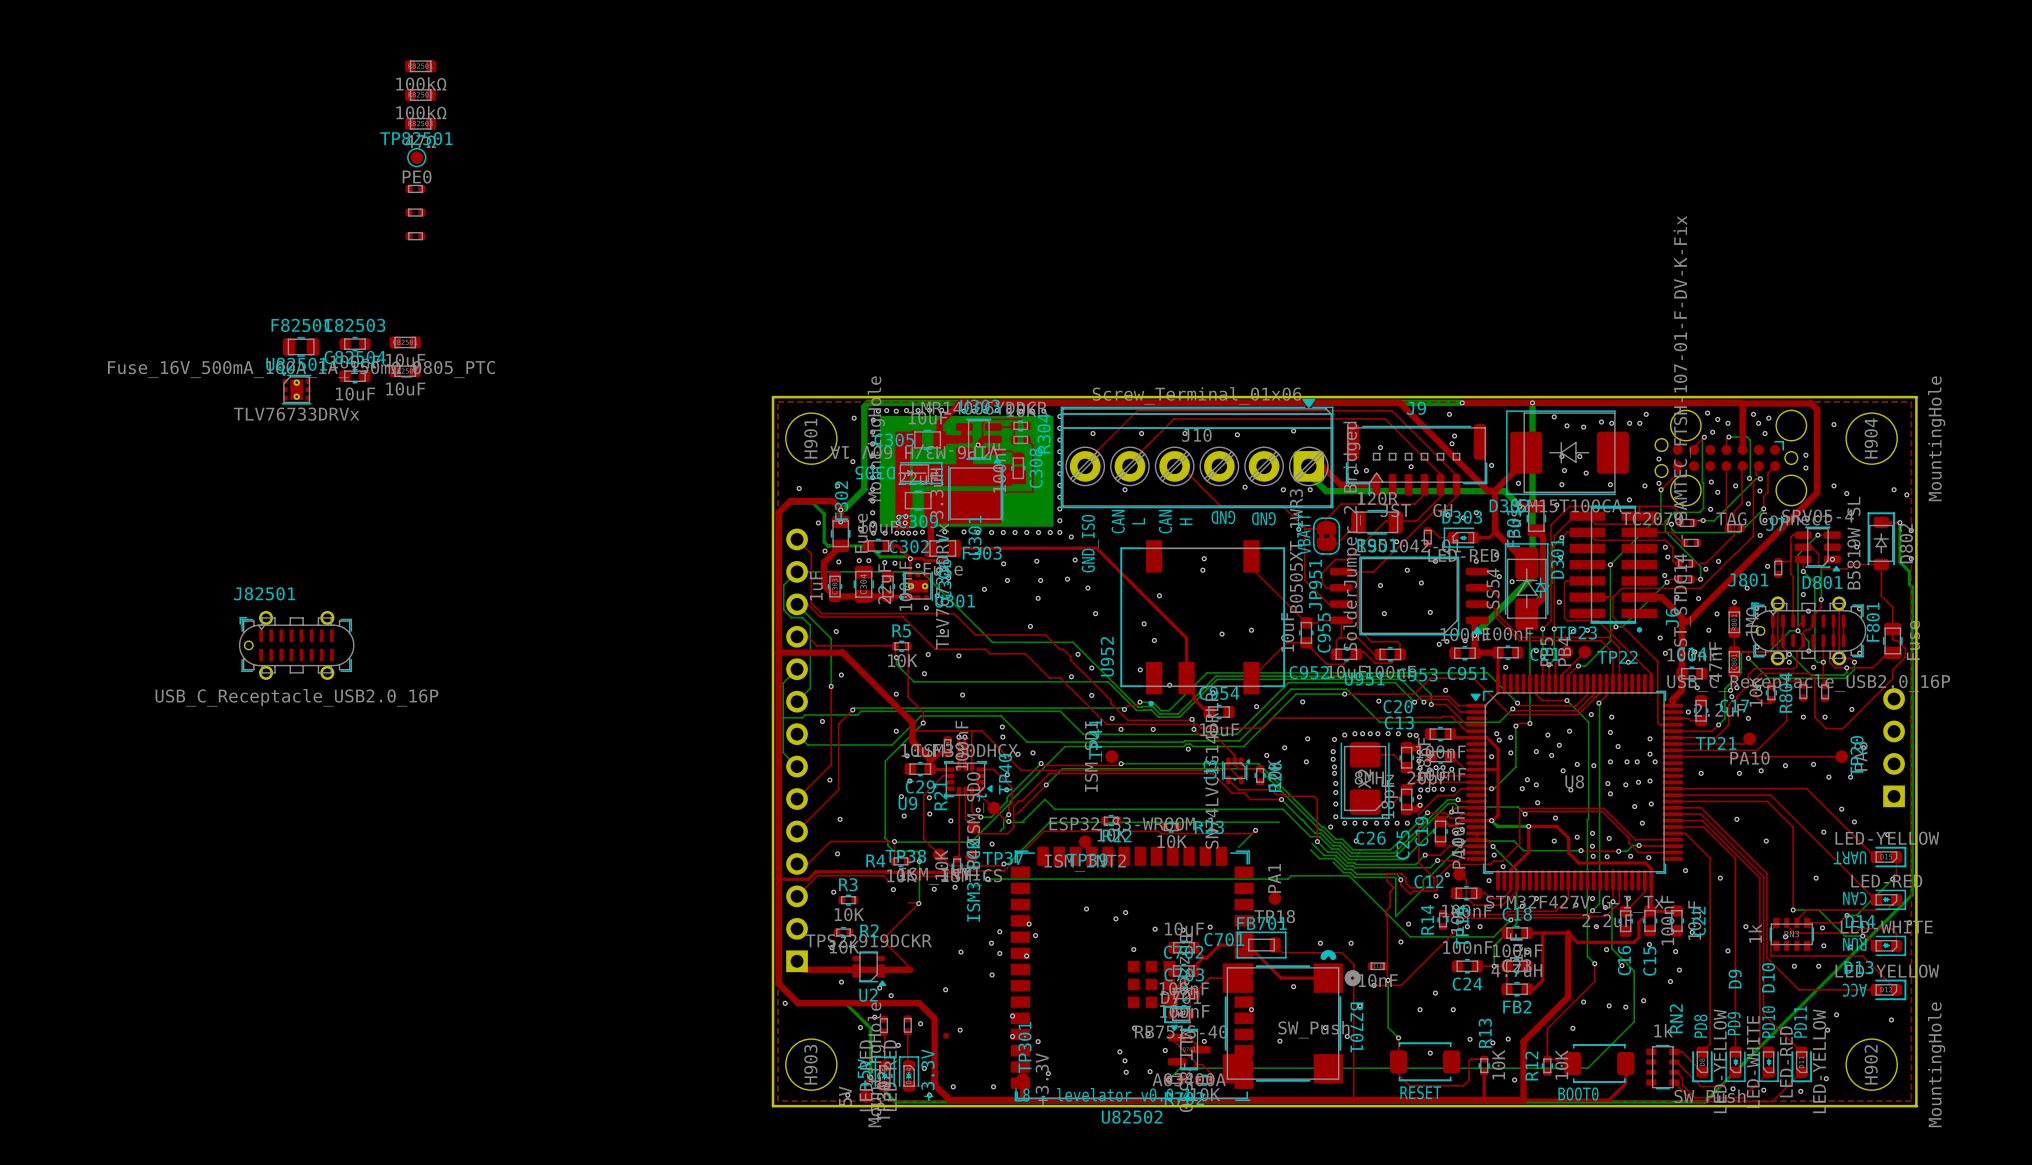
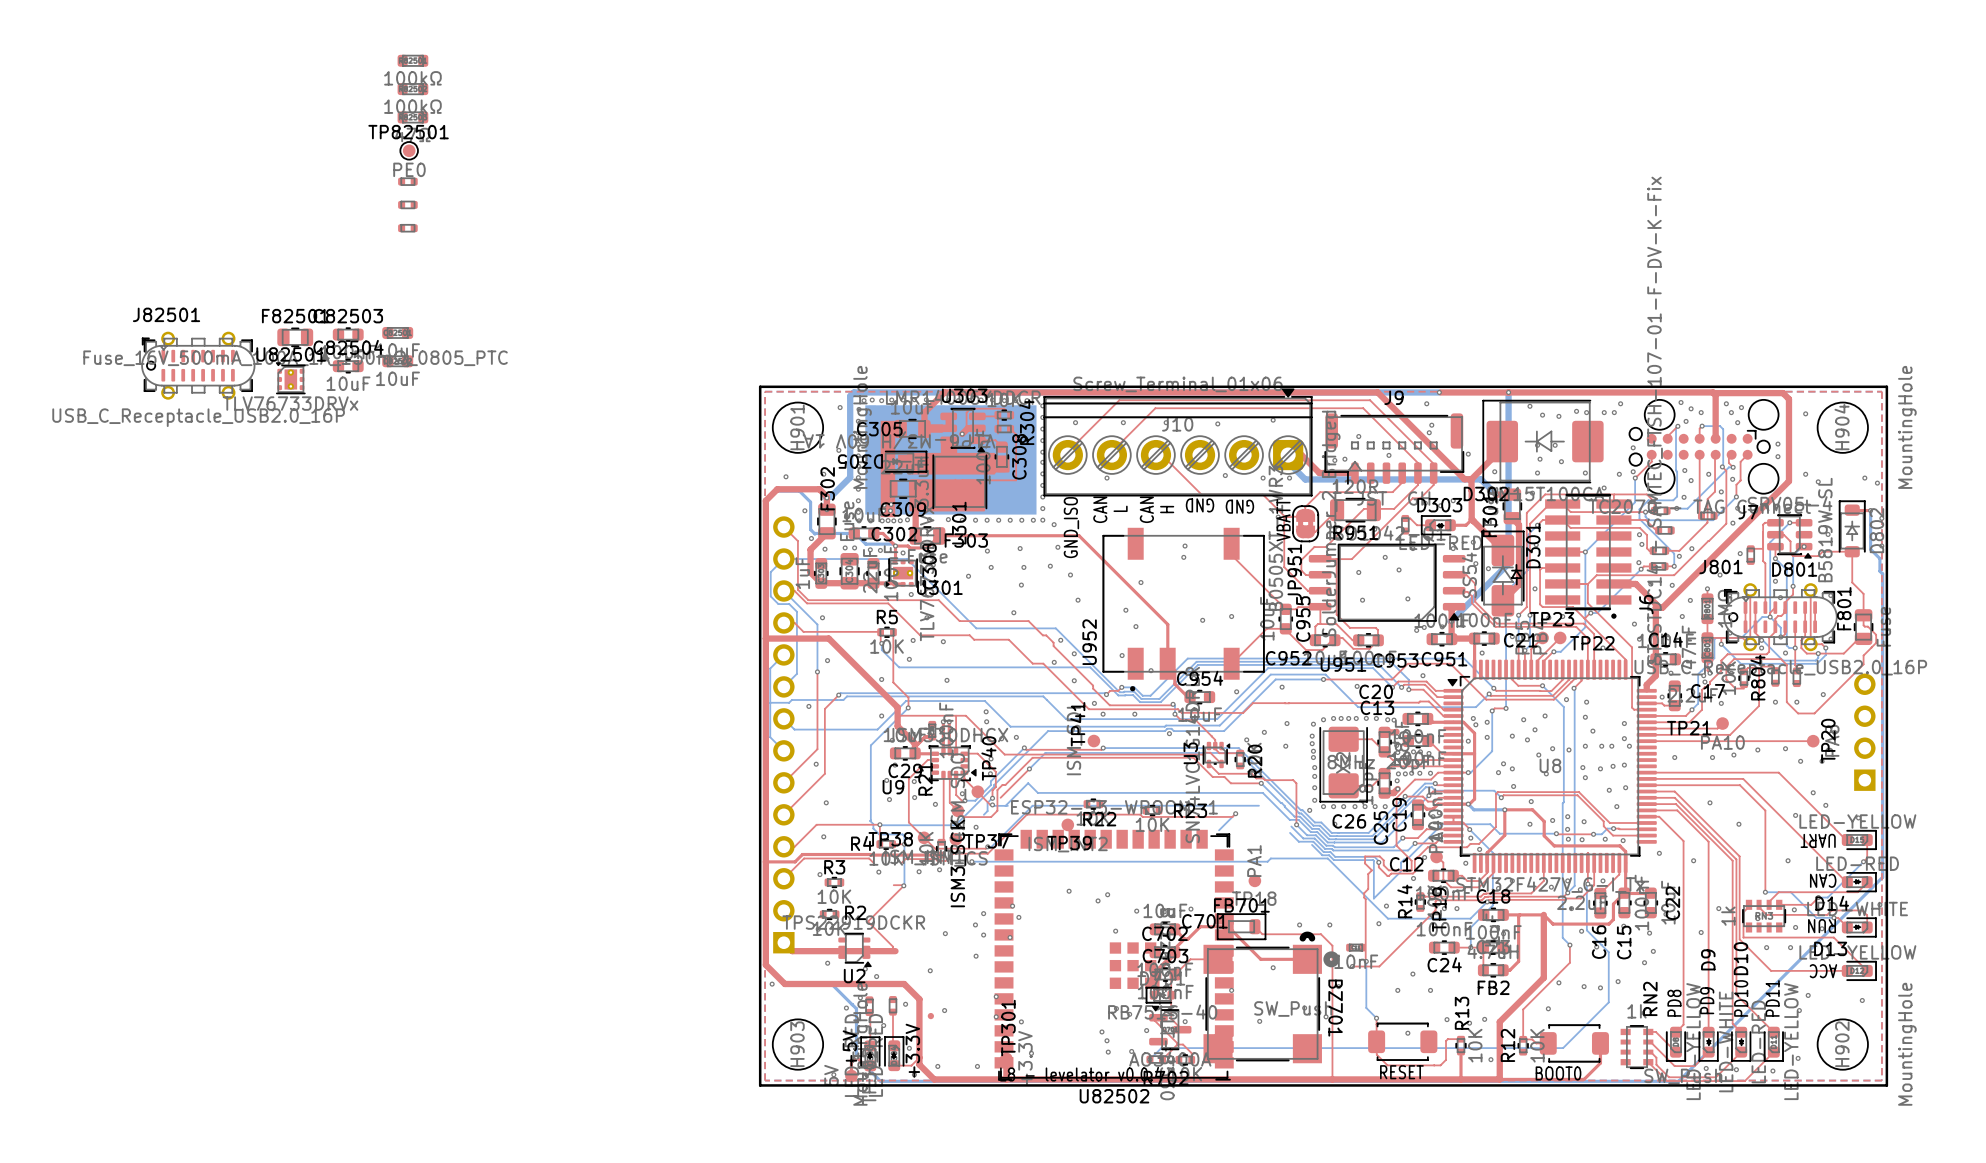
J82501 position: (296, 645) -> (198, 365)

